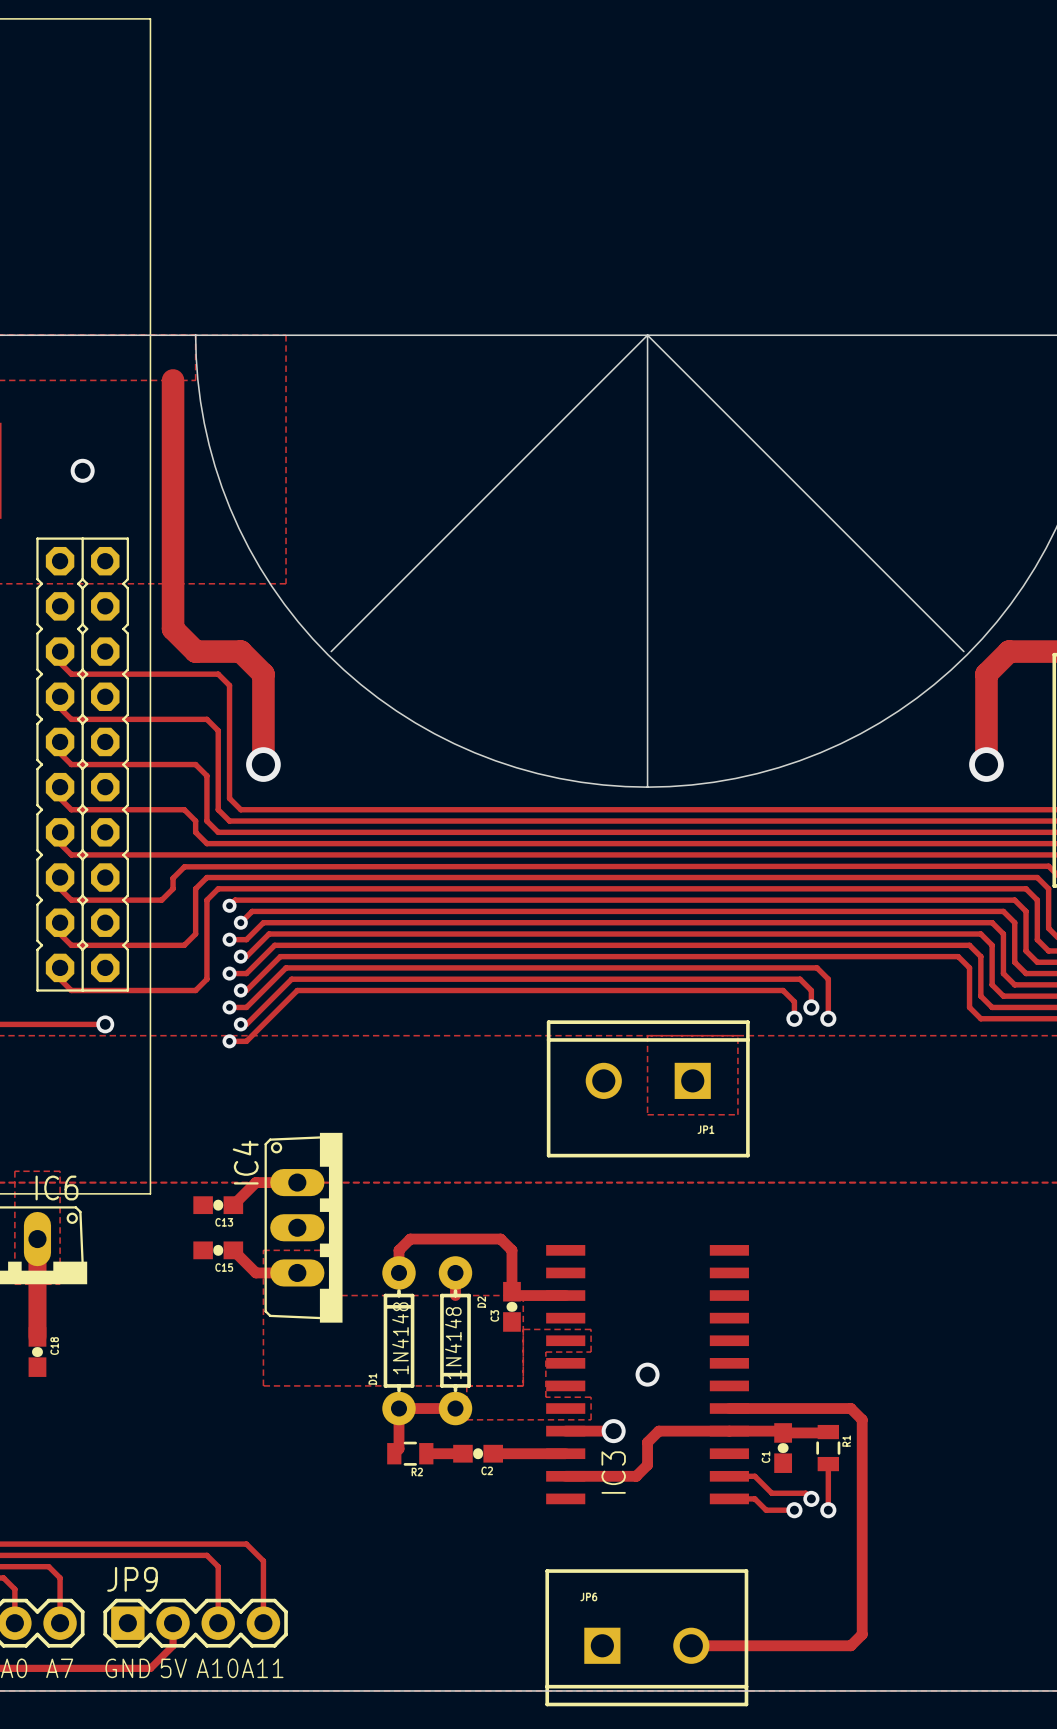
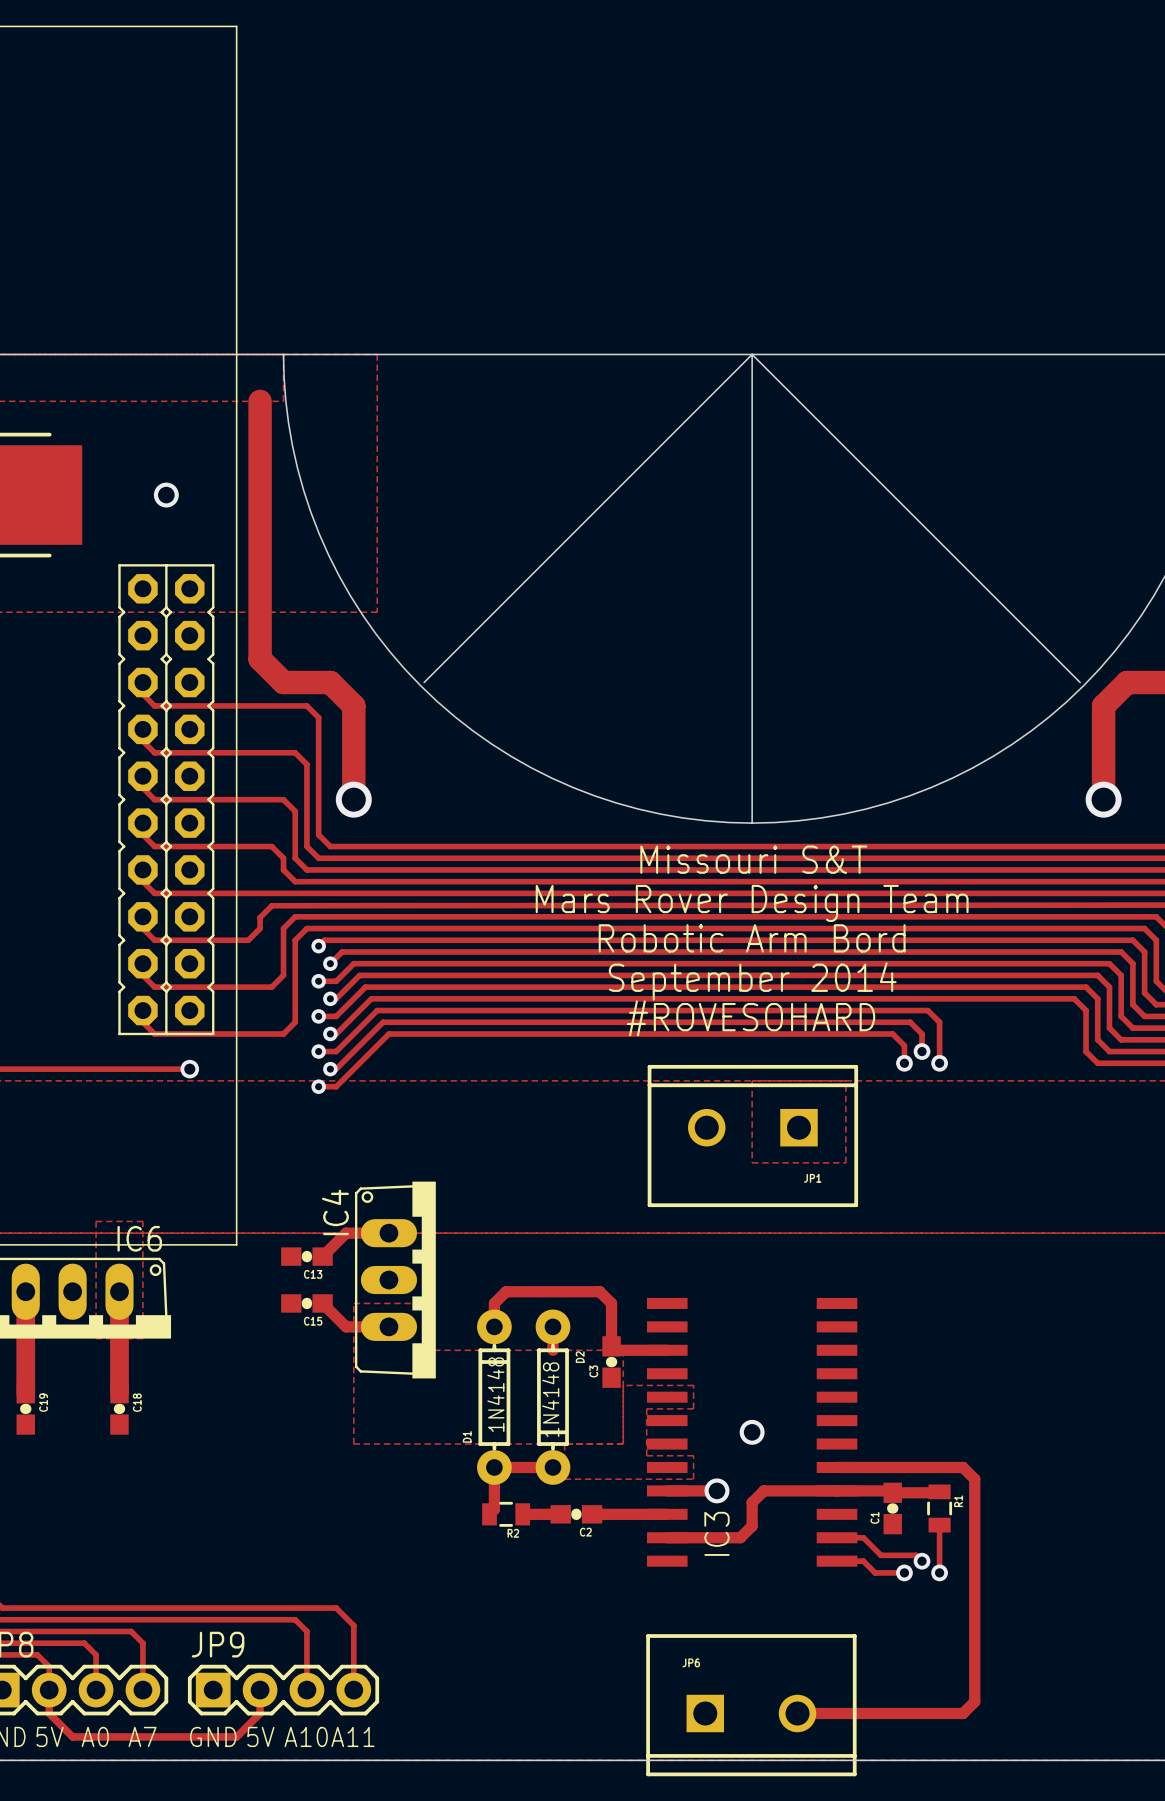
text: none -> Missouri S&T (753, 859)
text: none -> Mars Rover Design Team (752, 903)
text: none -> Robotic Arm Bord (752, 938)
text: none -> September 2014 (752, 981)
text: none -> #ROVESOHARD (751, 1018)

